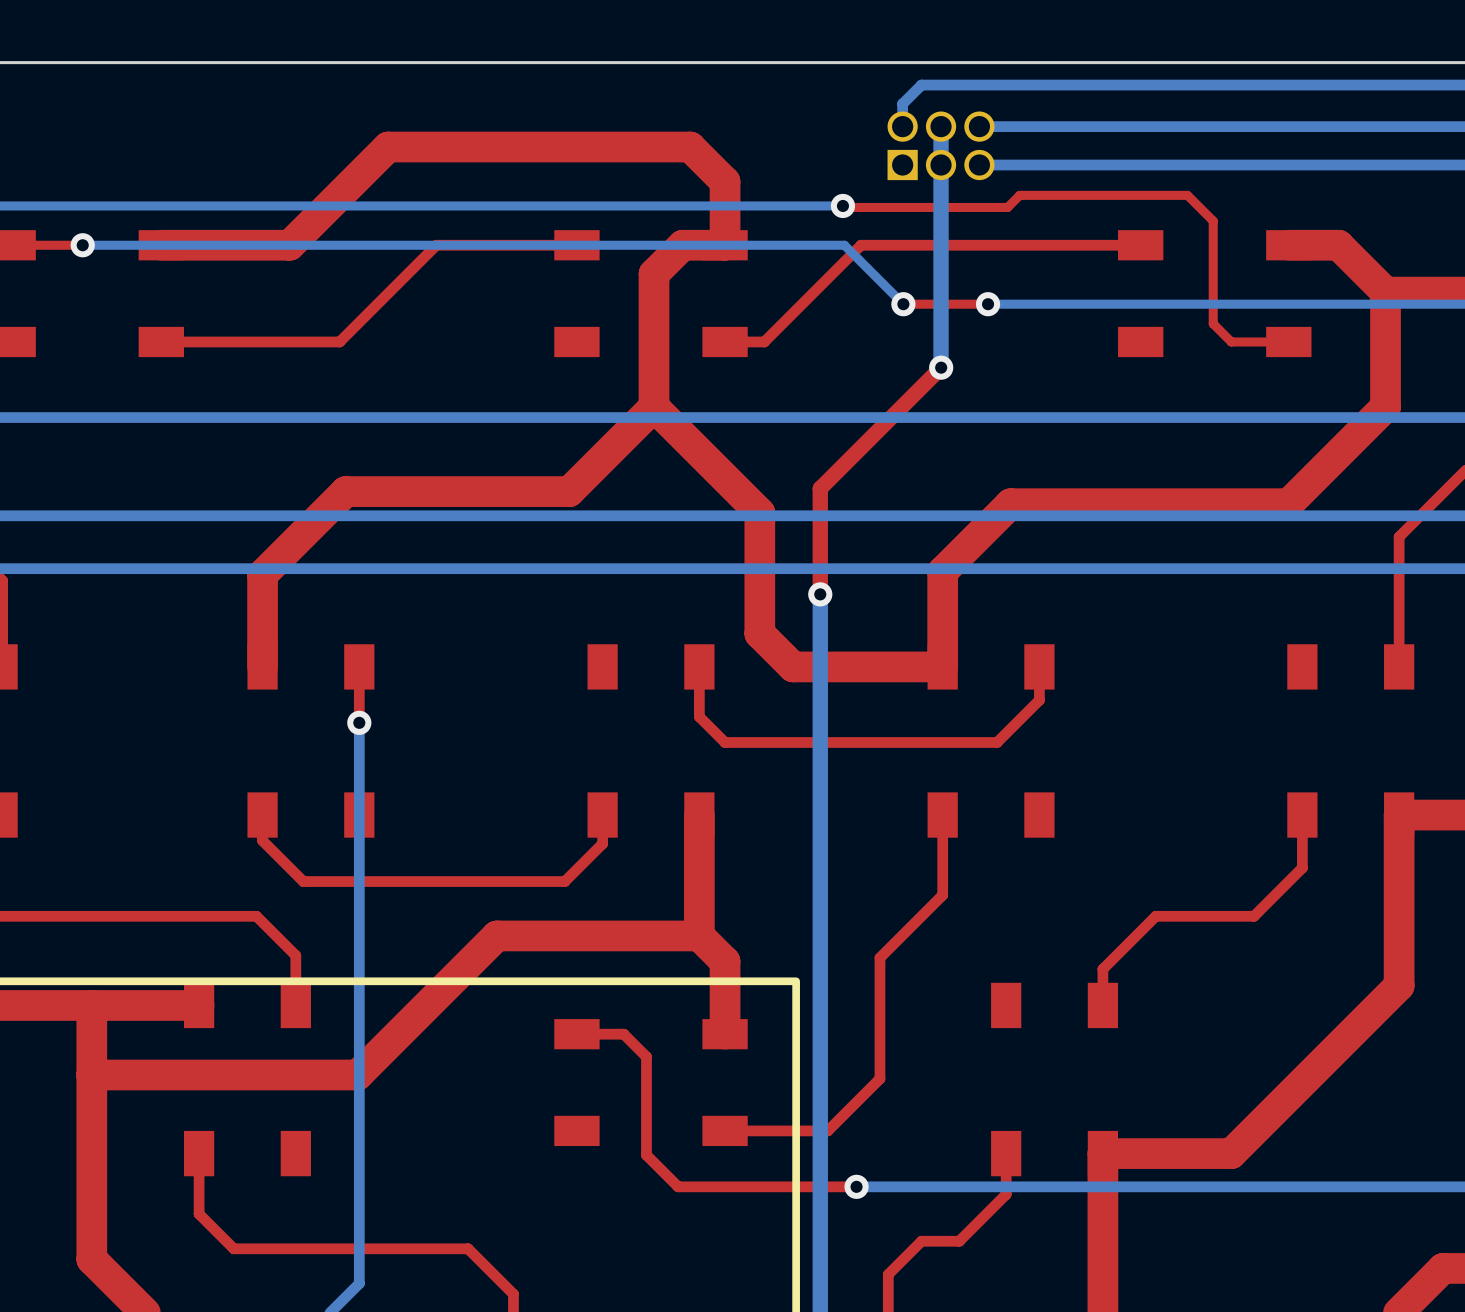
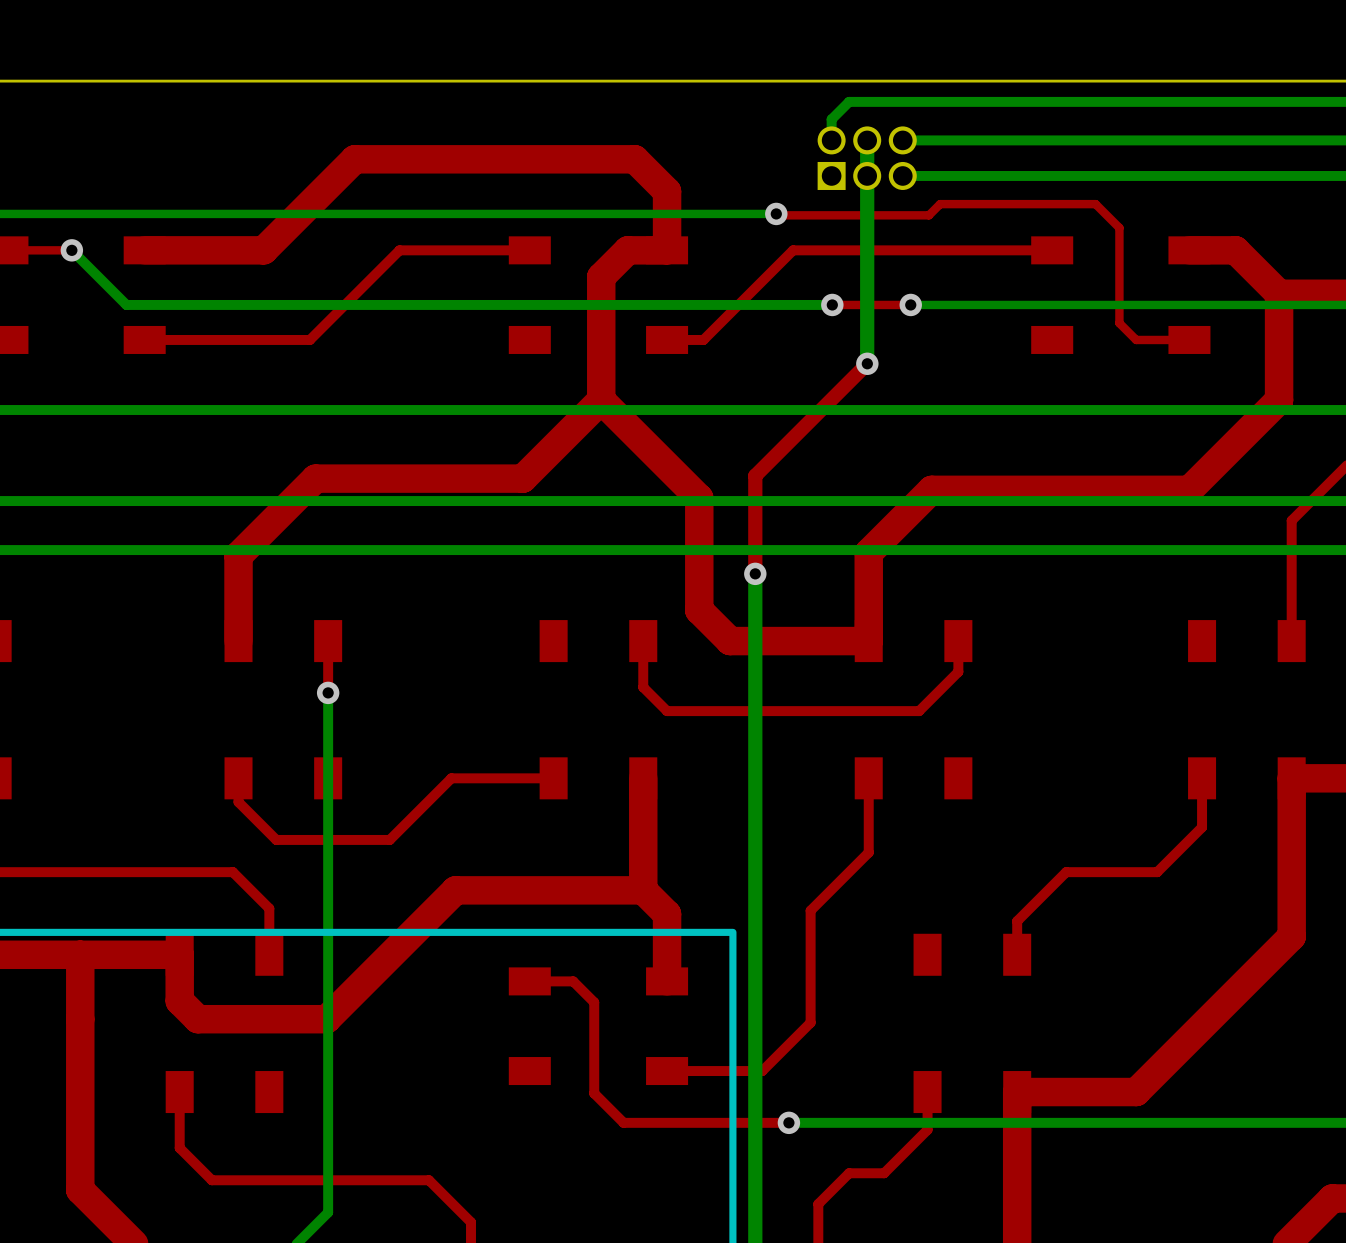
bottom track: (82, 245) (844, 245) (903, 304) -> (71, 250) (126, 304) (832, 304)
top track: (602, 815) (602, 843) (564, 881) (425, 881) -> (553, 778) (451, 778) (389, 839)
top track: (218, 1074) (91, 1074) -> (197, 1019) (179, 1001) (179, 954)

